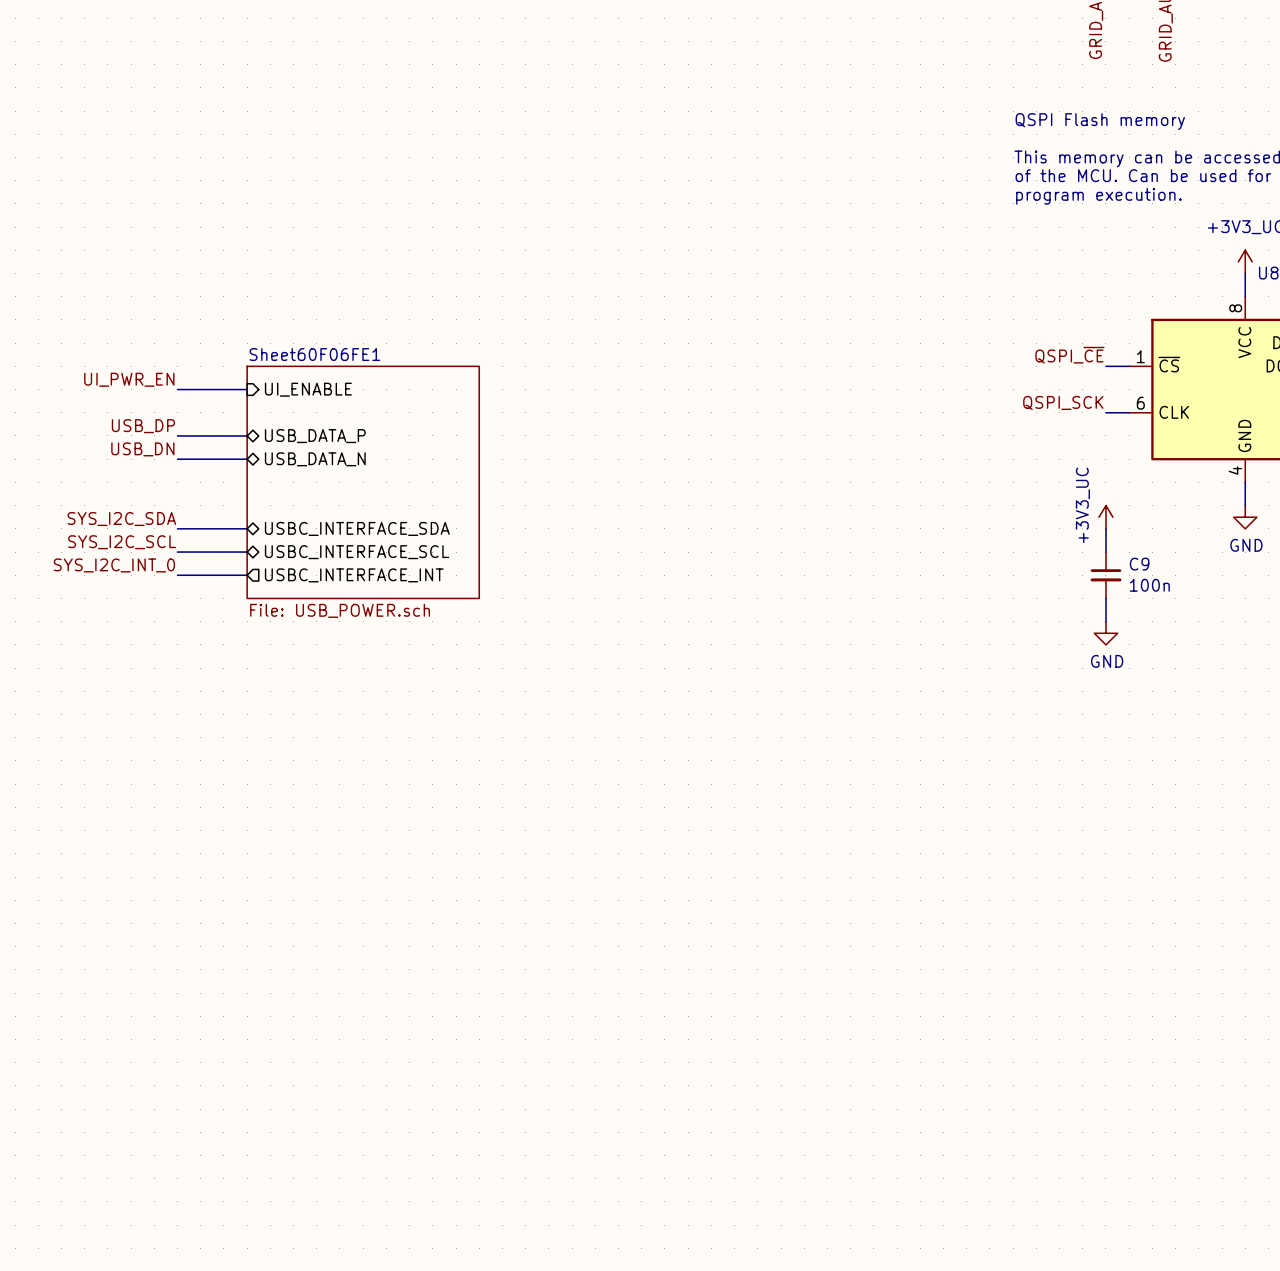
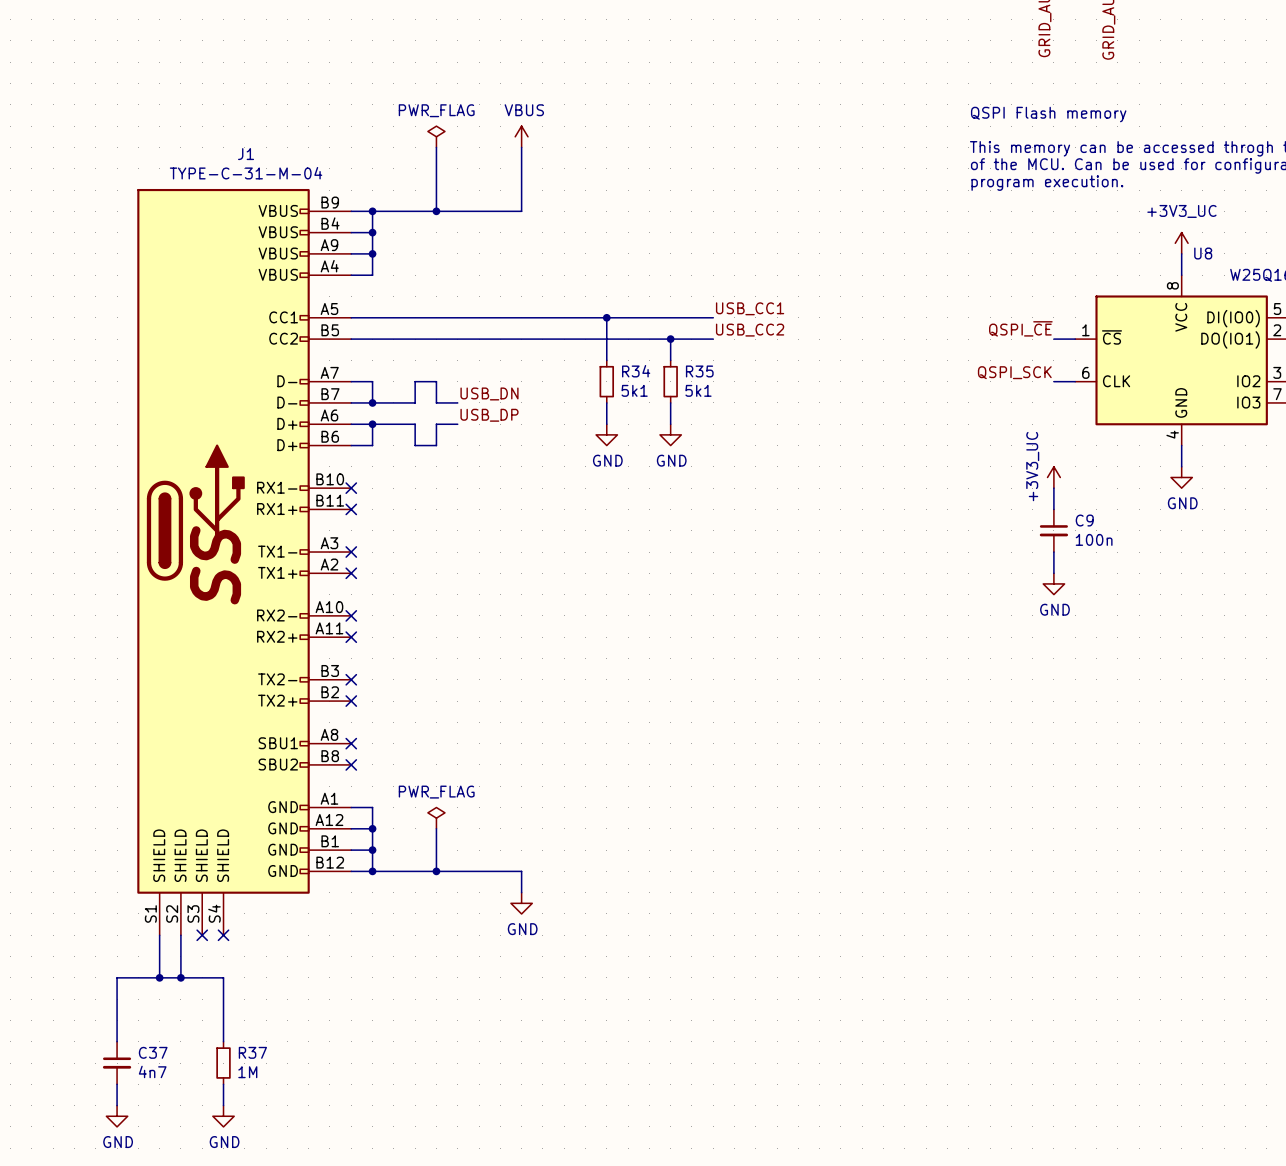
power symbol: none -> PWR_FLAG (436, 136)
power symbol: none -> VBUS (521, 136)
wire: none -> (436, 147) (436, 211)
wire: none -> (521, 147) (521, 211) (351, 211)
wire: none -> (372, 211) (372, 275) (351, 275)
junction: none -> (372, 211)
junction: none -> (436, 211)
wire: none -> (351, 232) (372, 232)
junction: none -> (372, 232)
wire: none -> (351, 253) (372, 253)
junction: none -> (372, 253)
label: none -> USB_CC1 (750, 308)
wire: none -> (351, 317) (713, 317)
wire: none -> (606, 317) (606, 360)
junction: none -> (606, 317)
label: none -> USB_CC2 (750, 330)
wire: none -> (351, 339) (713, 339)
wire: none -> (670, 339) (670, 360)
junction: none -> (670, 339)
label: UI_PWR_EN (129, 379) -> none
sheet pin: UI_ENABLE (308, 389) -> none
wire: none -> (351, 381) (372, 381) (372, 402)
R34: none -> 5k1 (606, 381)
R35: none -> 5k1 (670, 381)
label: USB_DP (143, 426) -> none
label: none -> USB_DN (489, 393)
wire: none -> (351, 402) (415, 402) (415, 381) (436, 381) (436, 402) (457, 402)
junction: none -> (372, 402)
wire: none -> (606, 402) (606, 424)
wire: none -> (670, 402) (670, 424)
sheet pin: USB_DATA_P (315, 436) -> none
label: USB_DN (142, 449) -> none
label: none -> USB_DP (489, 415)
sheet pin: USB_DATA_N (315, 459) -> none
wire: none -> (351, 424) (415, 424) (415, 445) (436, 445) (436, 424) (457, 424)
wire: none -> (372, 424) (372, 445) (351, 445)
junction: none -> (372, 424)
power symbol: none -> GND (606, 434)
power symbol: none -> GND (670, 434)
sheet Sheet60F06FE1: File: USB_POWER.sch (363, 482) -> none
label: SYS_I2C_SDA (121, 519) -> none
no-connect mark: none -> (351, 488)
sheet pin: USBC_INTERFACE_SDA (357, 528) -> none
label: SYS_I2C_SCL (122, 542) -> none
no-connect mark: none -> (351, 509)
sheet pin: USBC_INTERFACE_SCL (357, 552) -> none
label: SYS_I2C_INT_0 (114, 565) -> none
sheet pin: USBC_INTERFACE_INT (354, 575) -> none
no-connect mark: none -> (351, 552)
J1: none -> TYPE-C-31-M-04 (244, 562)
no-connect mark: none -> (351, 573)
no-connect mark: none -> (351, 615)
no-connect mark: none -> (351, 637)
no-connect mark: none -> (351, 679)
no-connect mark: none -> (351, 701)
no-connect mark: none -> (351, 743)
no-connect mark: none -> (351, 764)
wire: none -> (351, 807) (372, 807) (372, 871)
power symbol: none -> PWR_FLAG (436, 818)
wire: none -> (351, 828) (372, 828)
junction: none -> (372, 828)
wire: none -> (436, 828) (436, 871)
wire: none -> (351, 850) (372, 850)
junction: none -> (372, 850)
wire: none -> (351, 871) (521, 871) (521, 892)
junction: none -> (372, 871)
junction: none -> (436, 871)
power symbol: none -> GND (521, 903)
wire: none -> (159, 935) (159, 977)
wire: none -> (180, 935) (180, 977)
no-connect mark: none -> (202, 935)
no-connect mark: none -> (223, 935)
junction: none -> (159, 977)
junction: none -> (180, 977)
wire: none -> (117, 1041) (117, 977) (223, 977) (223, 1041)
C37: none -> 4n7 (117, 1063)
R37: none -> 1M (223, 1063)
wire: none -> (117, 1084) (117, 1105)
wire: none -> (223, 1084) (223, 1105)
power symbol: none -> GND (117, 1116)
power symbol: none -> GND (223, 1116)

